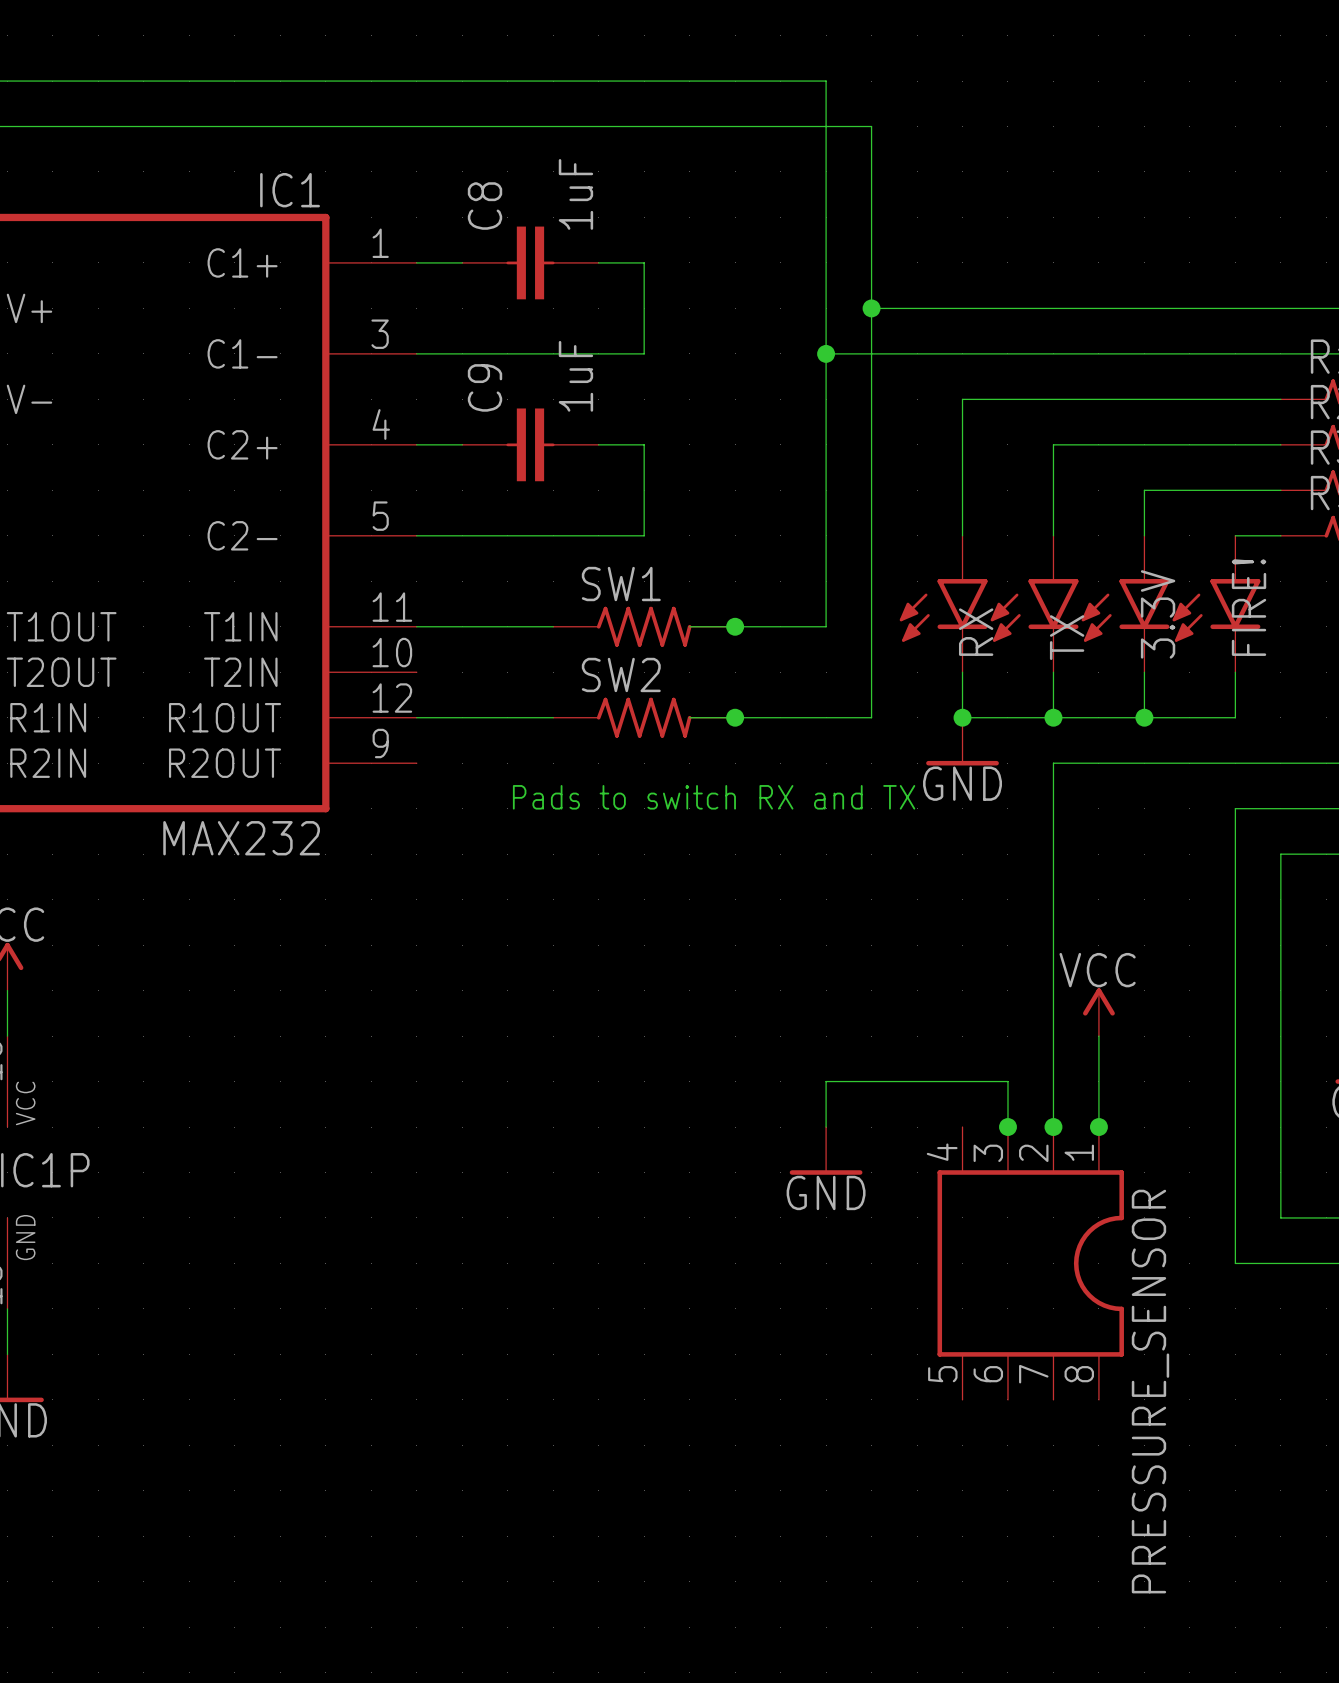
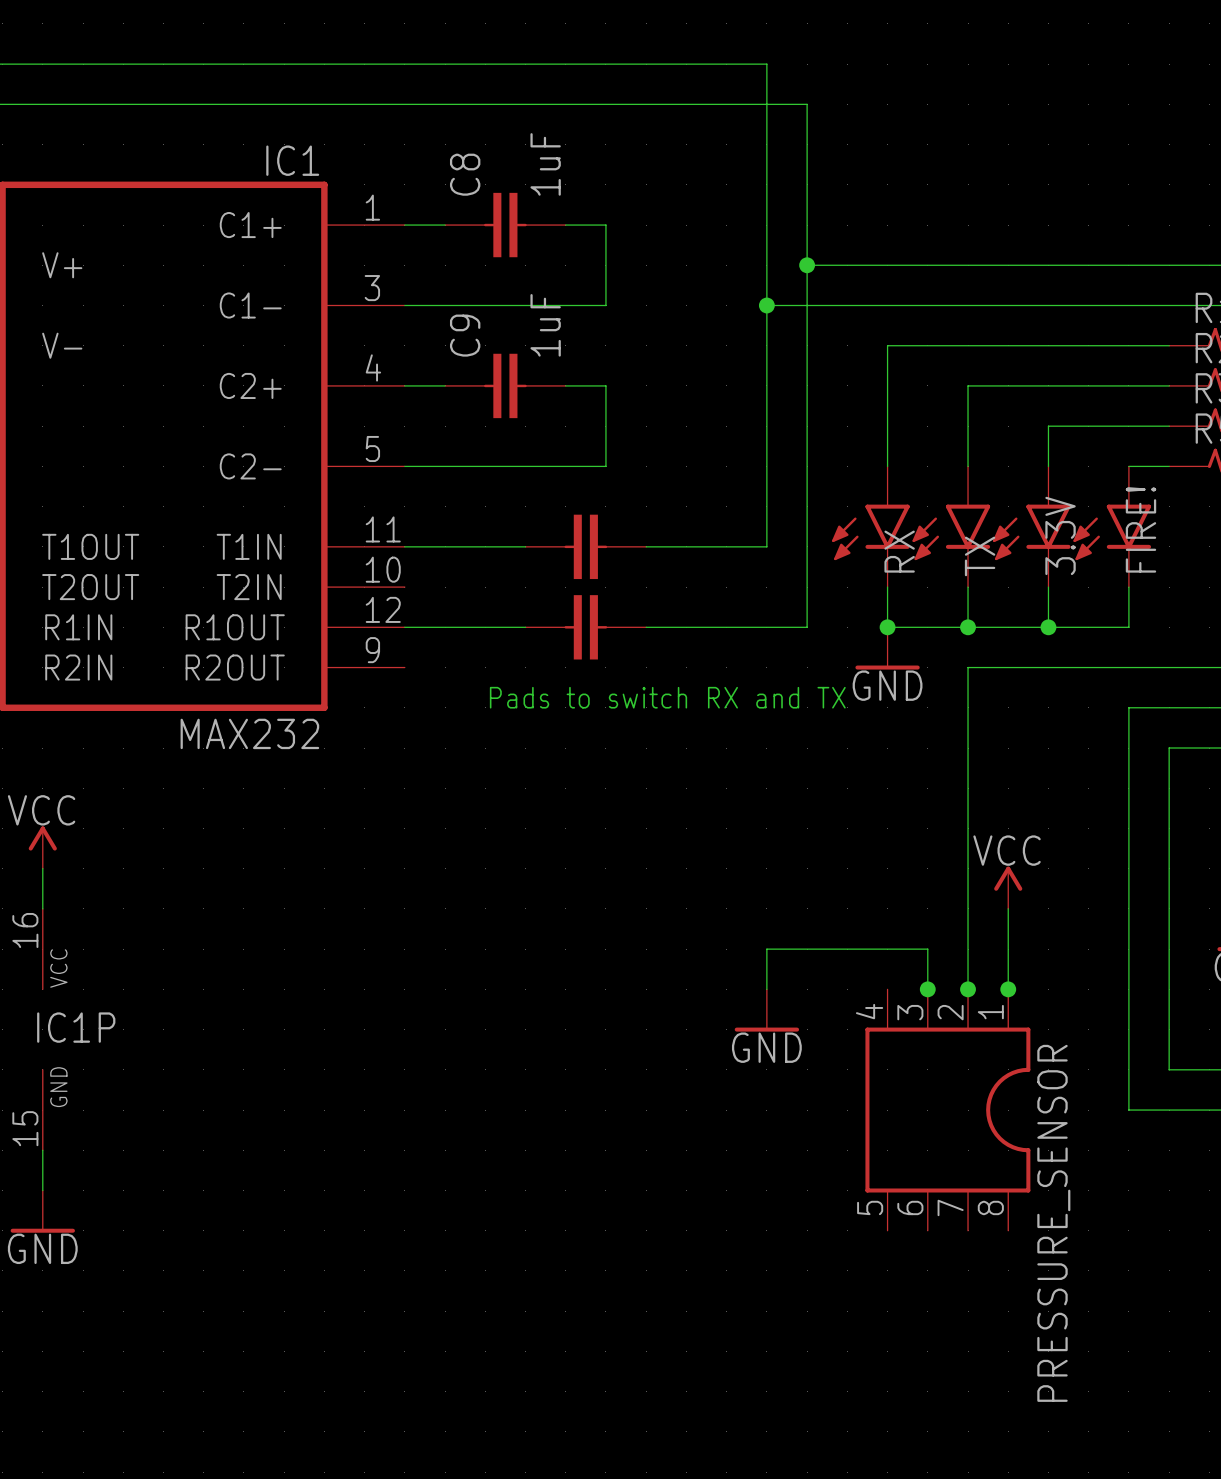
part: none -> (585, 546)
SW1: (644, 626) -> none
junction: (735, 626) -> none
part: none -> (585, 627)
SW2: (644, 717) -> none
junction: (735, 717) -> none

